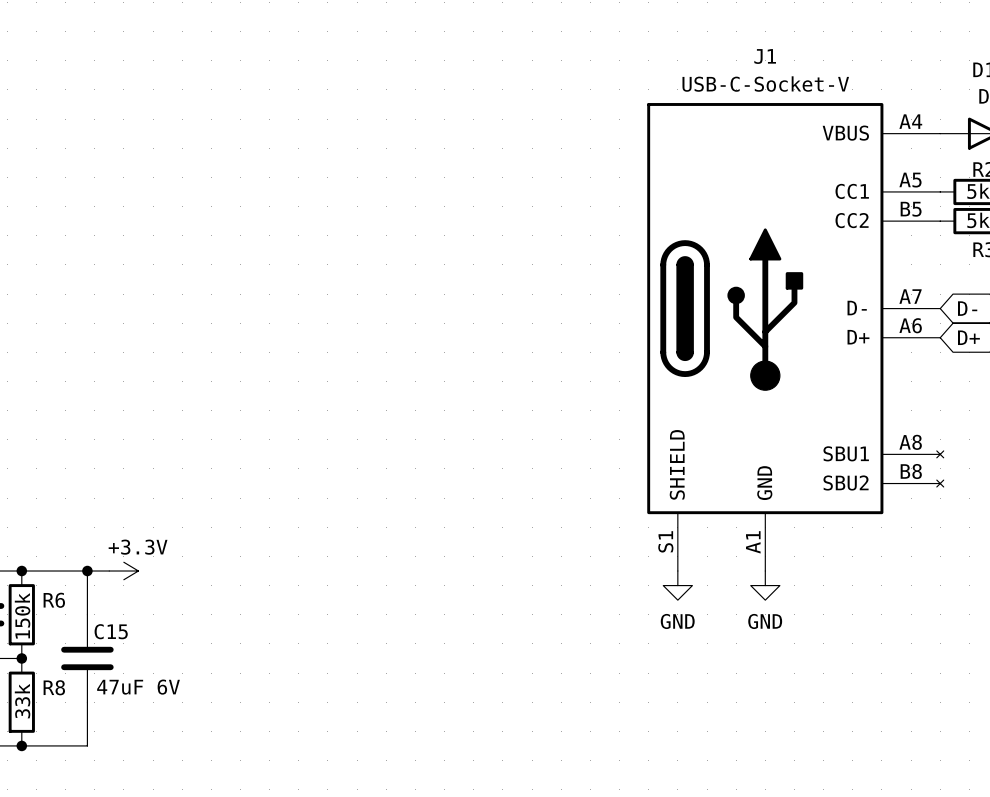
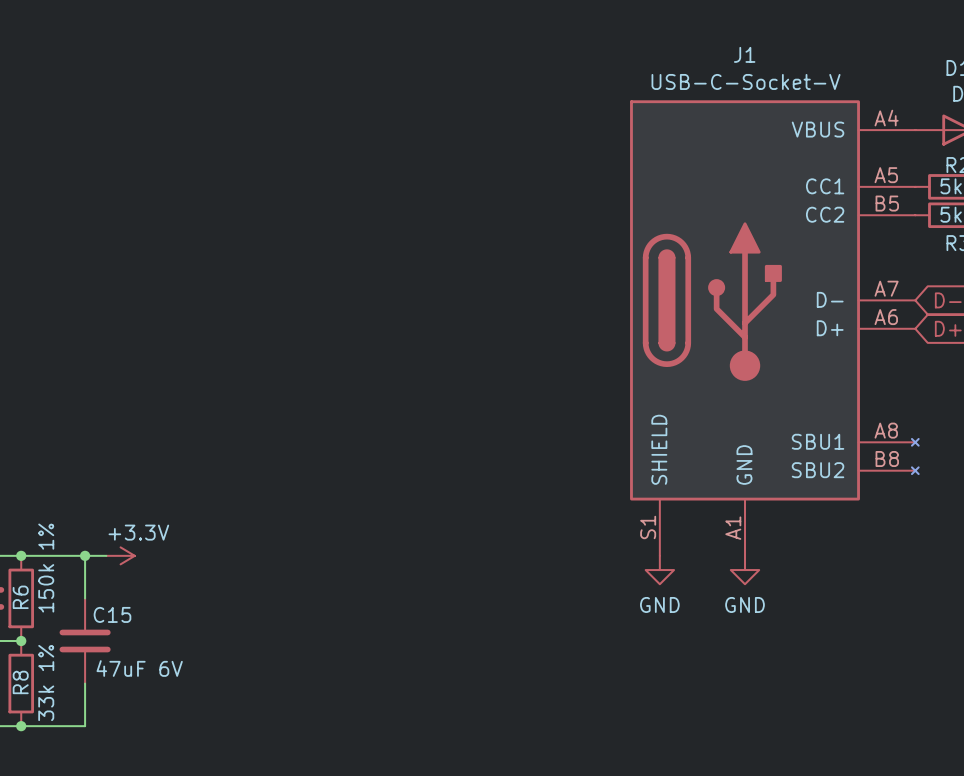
R6 name rotation: 0° (54, 600) -> 90° counterclockwise (20, 597)
R6 name position: R6 (54, 600) -> R6 (20, 597)
R6 value: 150k (22, 615) -> 150k 1% (46, 568)
R8 name rotation: 0° (54, 687) -> 90° counterclockwise (20, 682)
R8 name position: R8 (54, 687) -> R8 (20, 682)
R8 value: 33k (22, 701) -> 33k 1% (46, 683)

